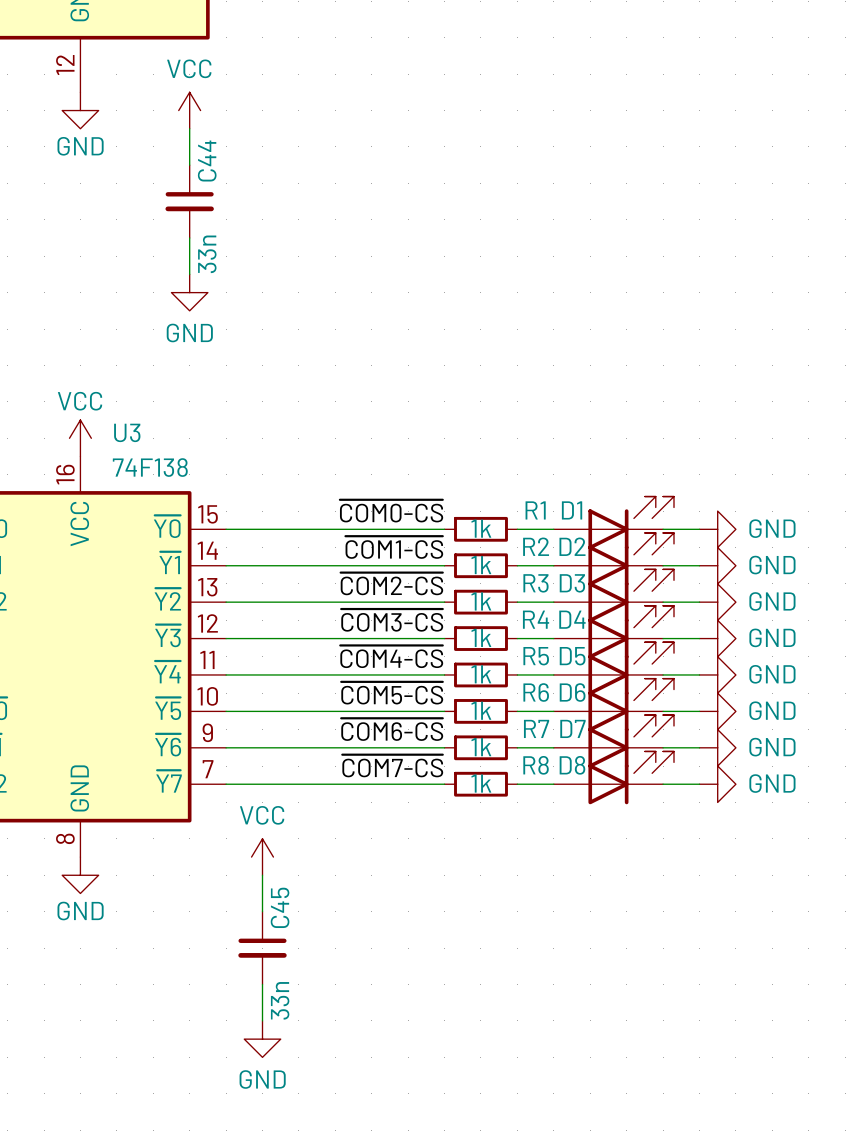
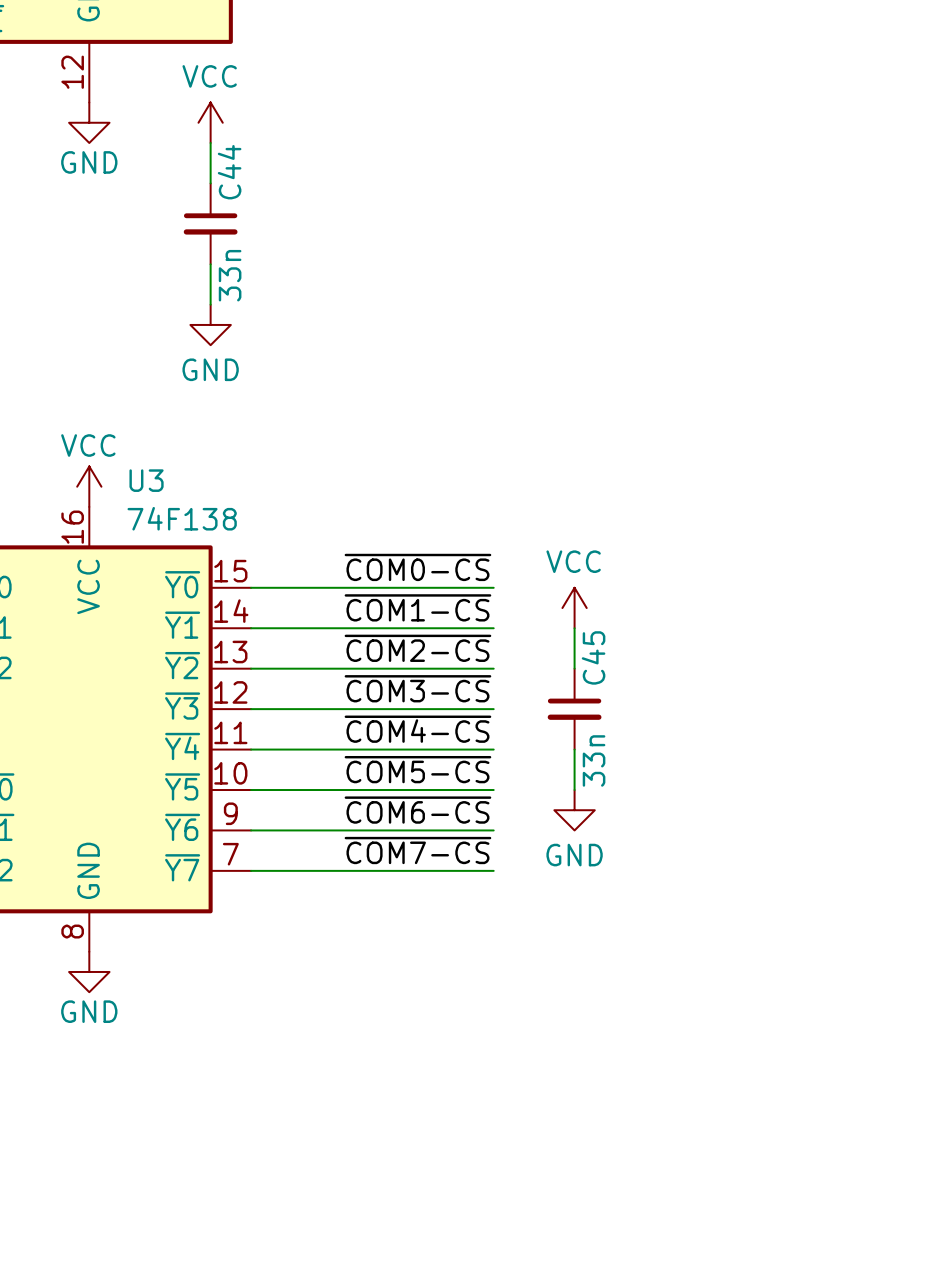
D1: (613, 522) -> none
R1: 1k (480, 529) -> none
wire: (517, 529) (553, 529) -> none
wire: (663, 529) (699, 529) -> none
power symbol: GND (717, 529) -> none
power symbol: none -> VCC (574, 608)
D2: (613, 559) -> none
R2: 1k (480, 565) -> none
wire: (517, 565) (553, 565) -> (574, 628) (574, 668)
wire: (663, 565) (699, 565) -> none
power symbol: GND (717, 565) -> none
D3: (613, 595) -> none
R3: 1k (480, 602) -> none
wire: (517, 602) (553, 602) -> none
wire: (663, 602) (699, 602) -> none
power symbol: GND (717, 602) -> none
D4: (613, 632) -> none
R4: 1k (480, 638) -> none
wire: (517, 638) (553, 638) -> none
wire: (663, 638) (699, 638) -> none
power symbol: GND (717, 638) -> none
D5: (613, 668) -> none
R5: 1k (480, 674) -> none
wire: (517, 674) (553, 674) -> (574, 749) (574, 790)
wire: (663, 674) (699, 674) -> none
power symbol: GND (717, 674) -> none
D6: (613, 705) -> none
R6: 1k (480, 711) -> none
wire: (517, 711) (553, 711) -> none
wire: (663, 711) (699, 711) -> none
power symbol: GND (717, 711) -> none
power symbol: none -> GND (574, 810)
D7: (613, 741) -> none
R7: 1k (480, 747) -> none
wire: (517, 747) (553, 747) -> none
wire: (663, 747) (699, 747) -> none
power symbol: GND (717, 747) -> none
D8: (613, 777) -> none
R8: 1k (480, 784) -> none
wire: (517, 784) (553, 784) -> none
wire: (663, 784) (699, 784) -> none
power symbol: GND (717, 784) -> none
power symbol: VCC (262, 857) -> none
wire: (262, 875) (262, 911) -> none
C45 position: (262, 948) -> (574, 709)
wire: (262, 984) (262, 1020) -> none
power symbol: GND (262, 1039) -> none

